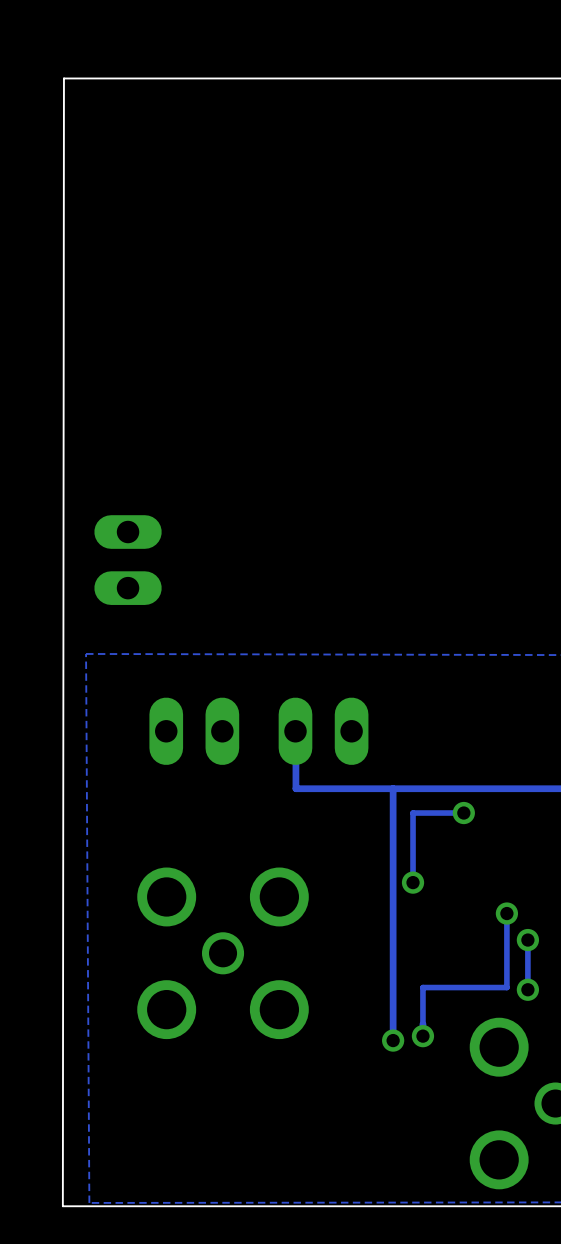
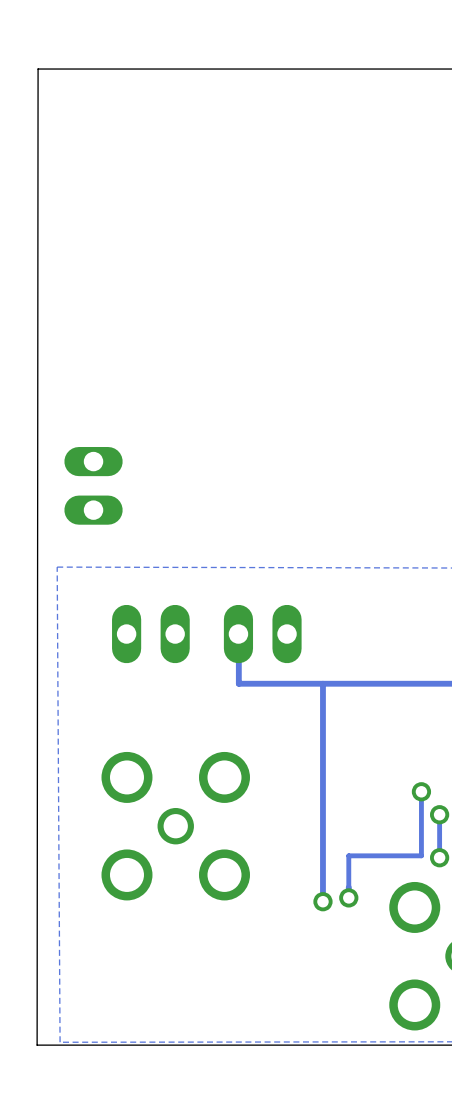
track: (463, 813) (413, 813) (413, 882) -> none
via: (463, 813) -> none
via: (413, 882) -> none

